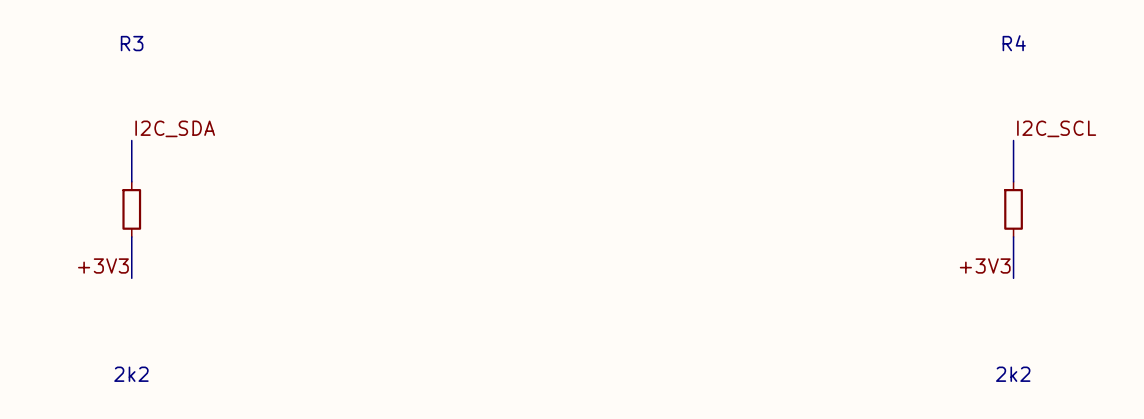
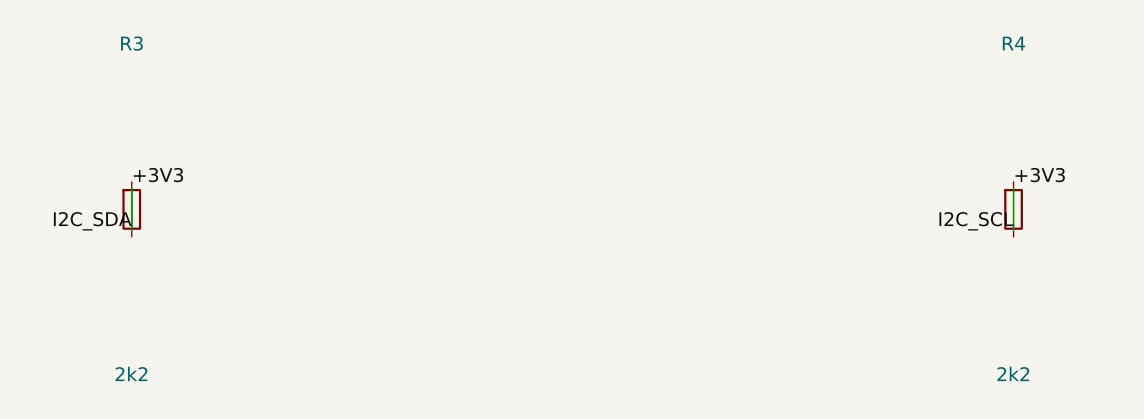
label position: I2C_SDA (175, 128) -> I2C_SDA (92, 221)
label position: I2C_SCL (1056, 128) -> I2C_SCL (976, 221)
wire: (131, 140) (131, 181) -> none
wire: (1013, 140) (1013, 181) -> none
wire: none -> (131, 187) (131, 231)
wire: none -> (1013, 187) (1013, 231)
wire: (131, 236) (131, 278) -> none
wire: (1013, 236) (1013, 278) -> none
label position: +3V3 (103, 266) -> +3V3 (158, 175)
label position: +3V3 (985, 266) -> +3V3 (1040, 175)

